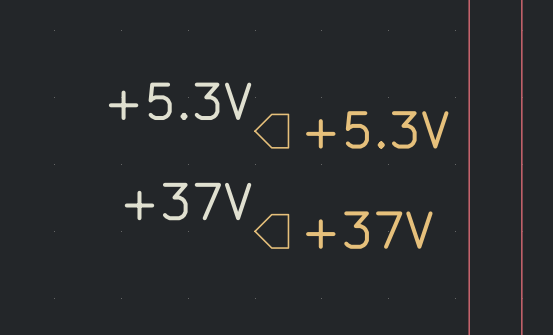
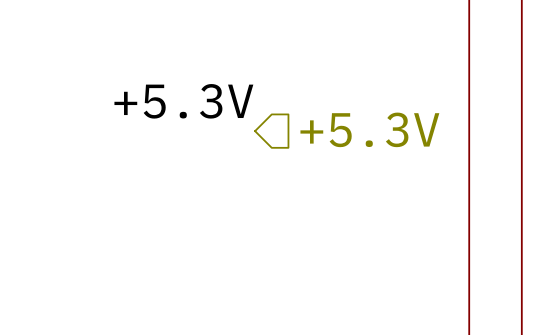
label: +37V (187, 201) -> none
hierarchical label: +37V (369, 230) -> none

